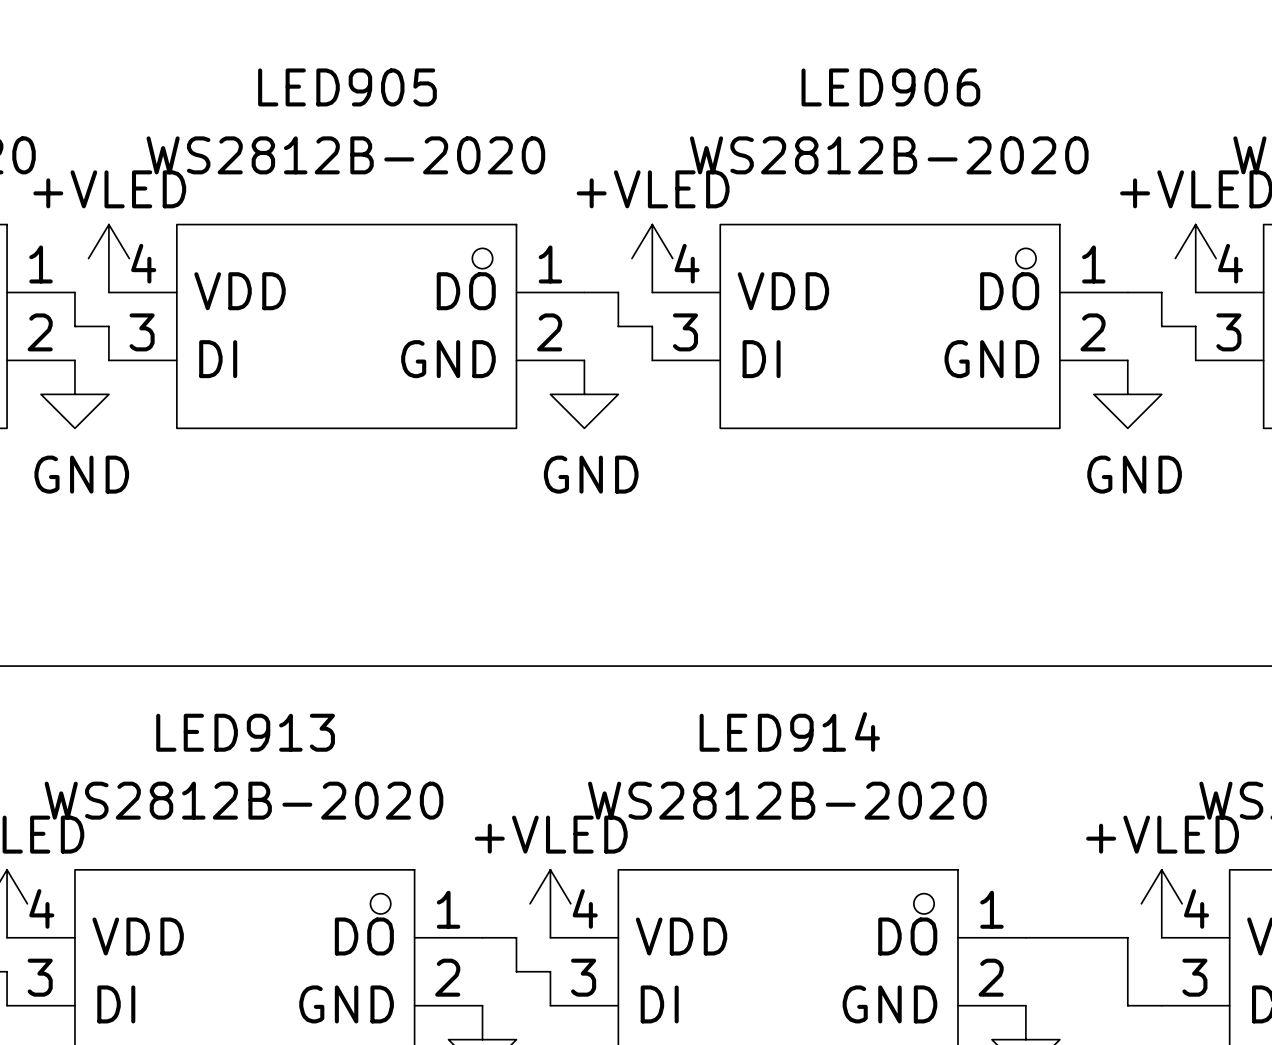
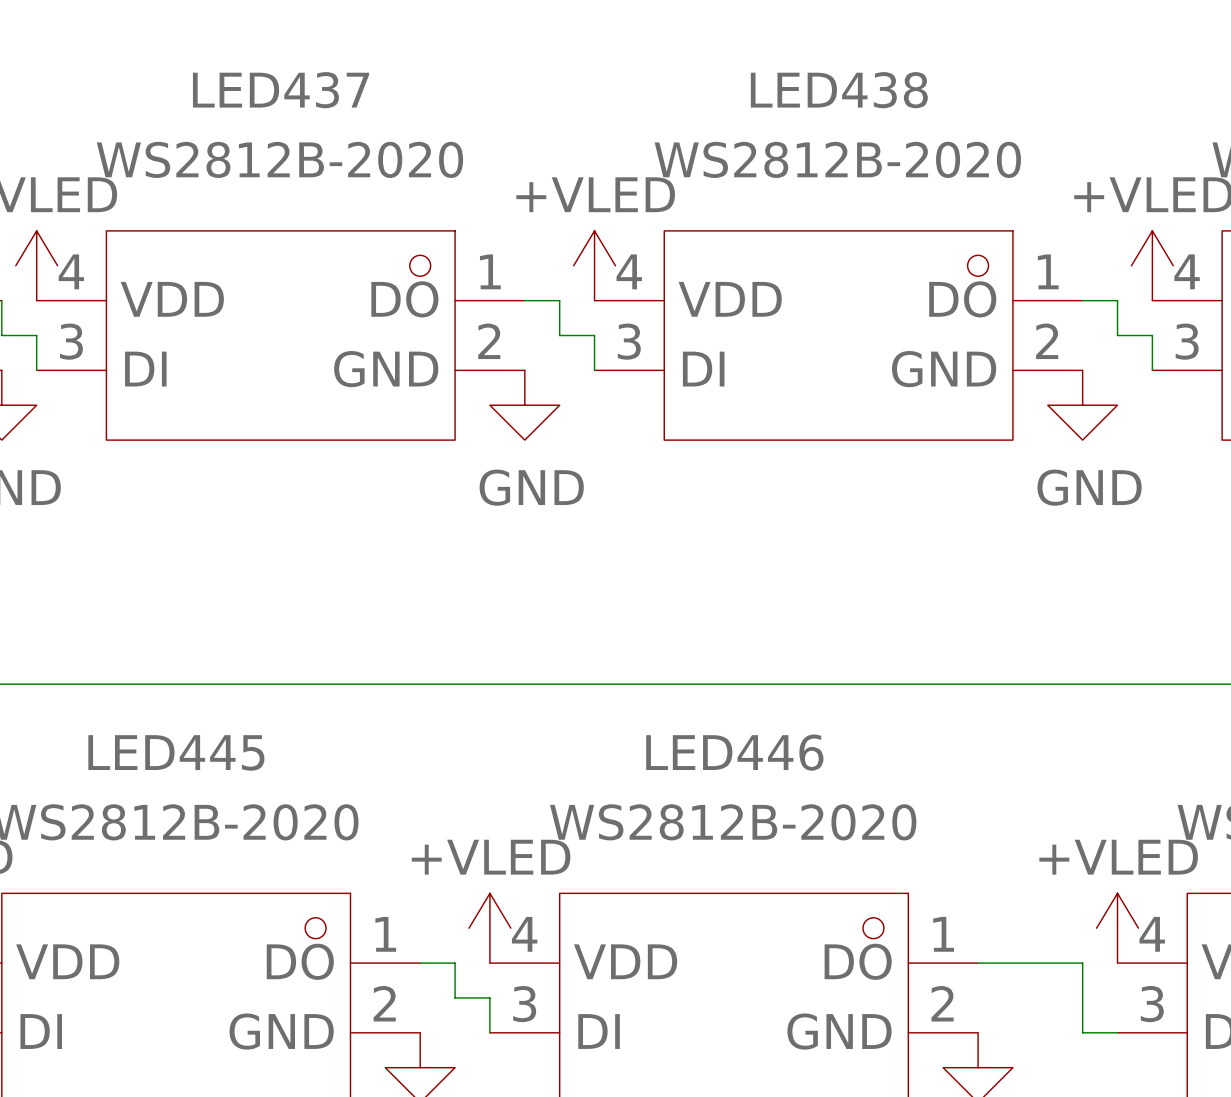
LED905 name: LED905 (347, 87) -> LED437 (281, 90)
LED906 name: LED906 (890, 87) -> LED438 (839, 90)
LED914 name: LED914 (789, 731) -> LED446 (734, 752)
LED913 name: LED913 (245, 732) -> LED445 (176, 752)

